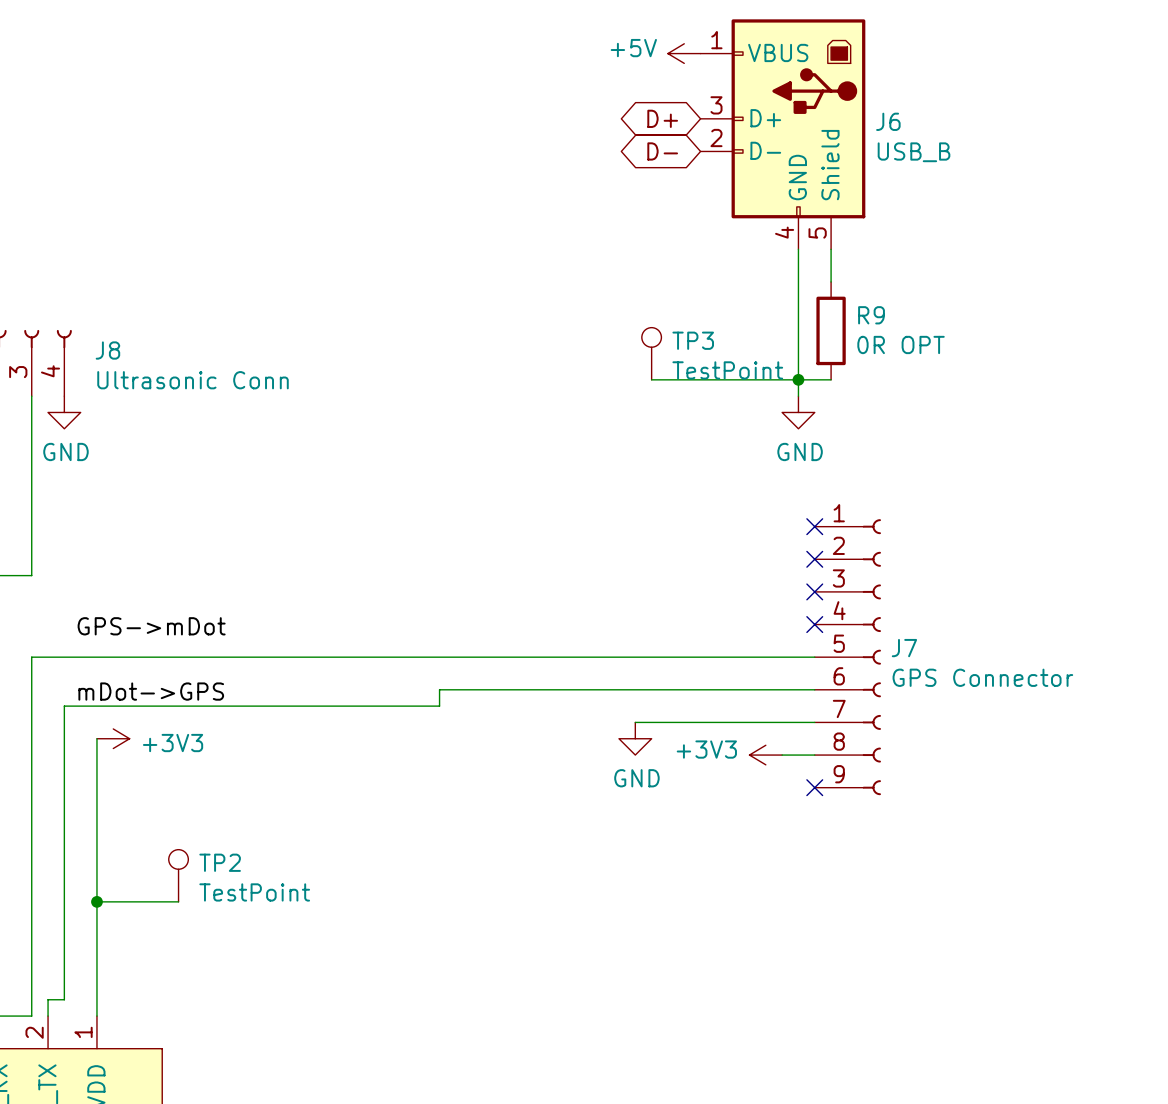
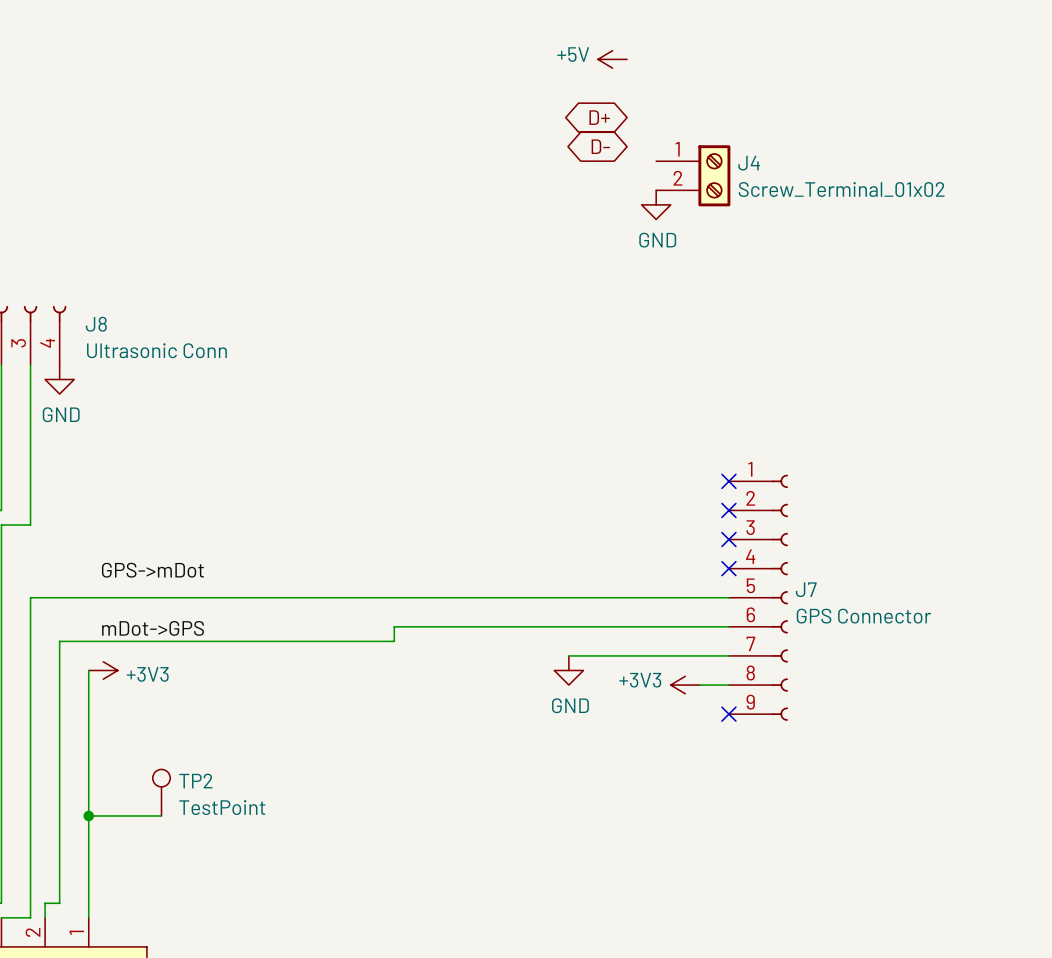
J6: USB_B (782, 134) -> none
J4: none -> Screw_Terminal_01x02 (693, 175)
wire: (798, 249) (798, 396) -> none
wire: (831, 249) (831, 281) -> none
R9: 0R OPT (831, 330) -> none
TP3: TestPoint (651, 353) -> none
wire: (651, 379) (831, 379) -> none
junction: (798, 379) -> none
power symbol position: GND (798, 412) -> GND (656, 204)

